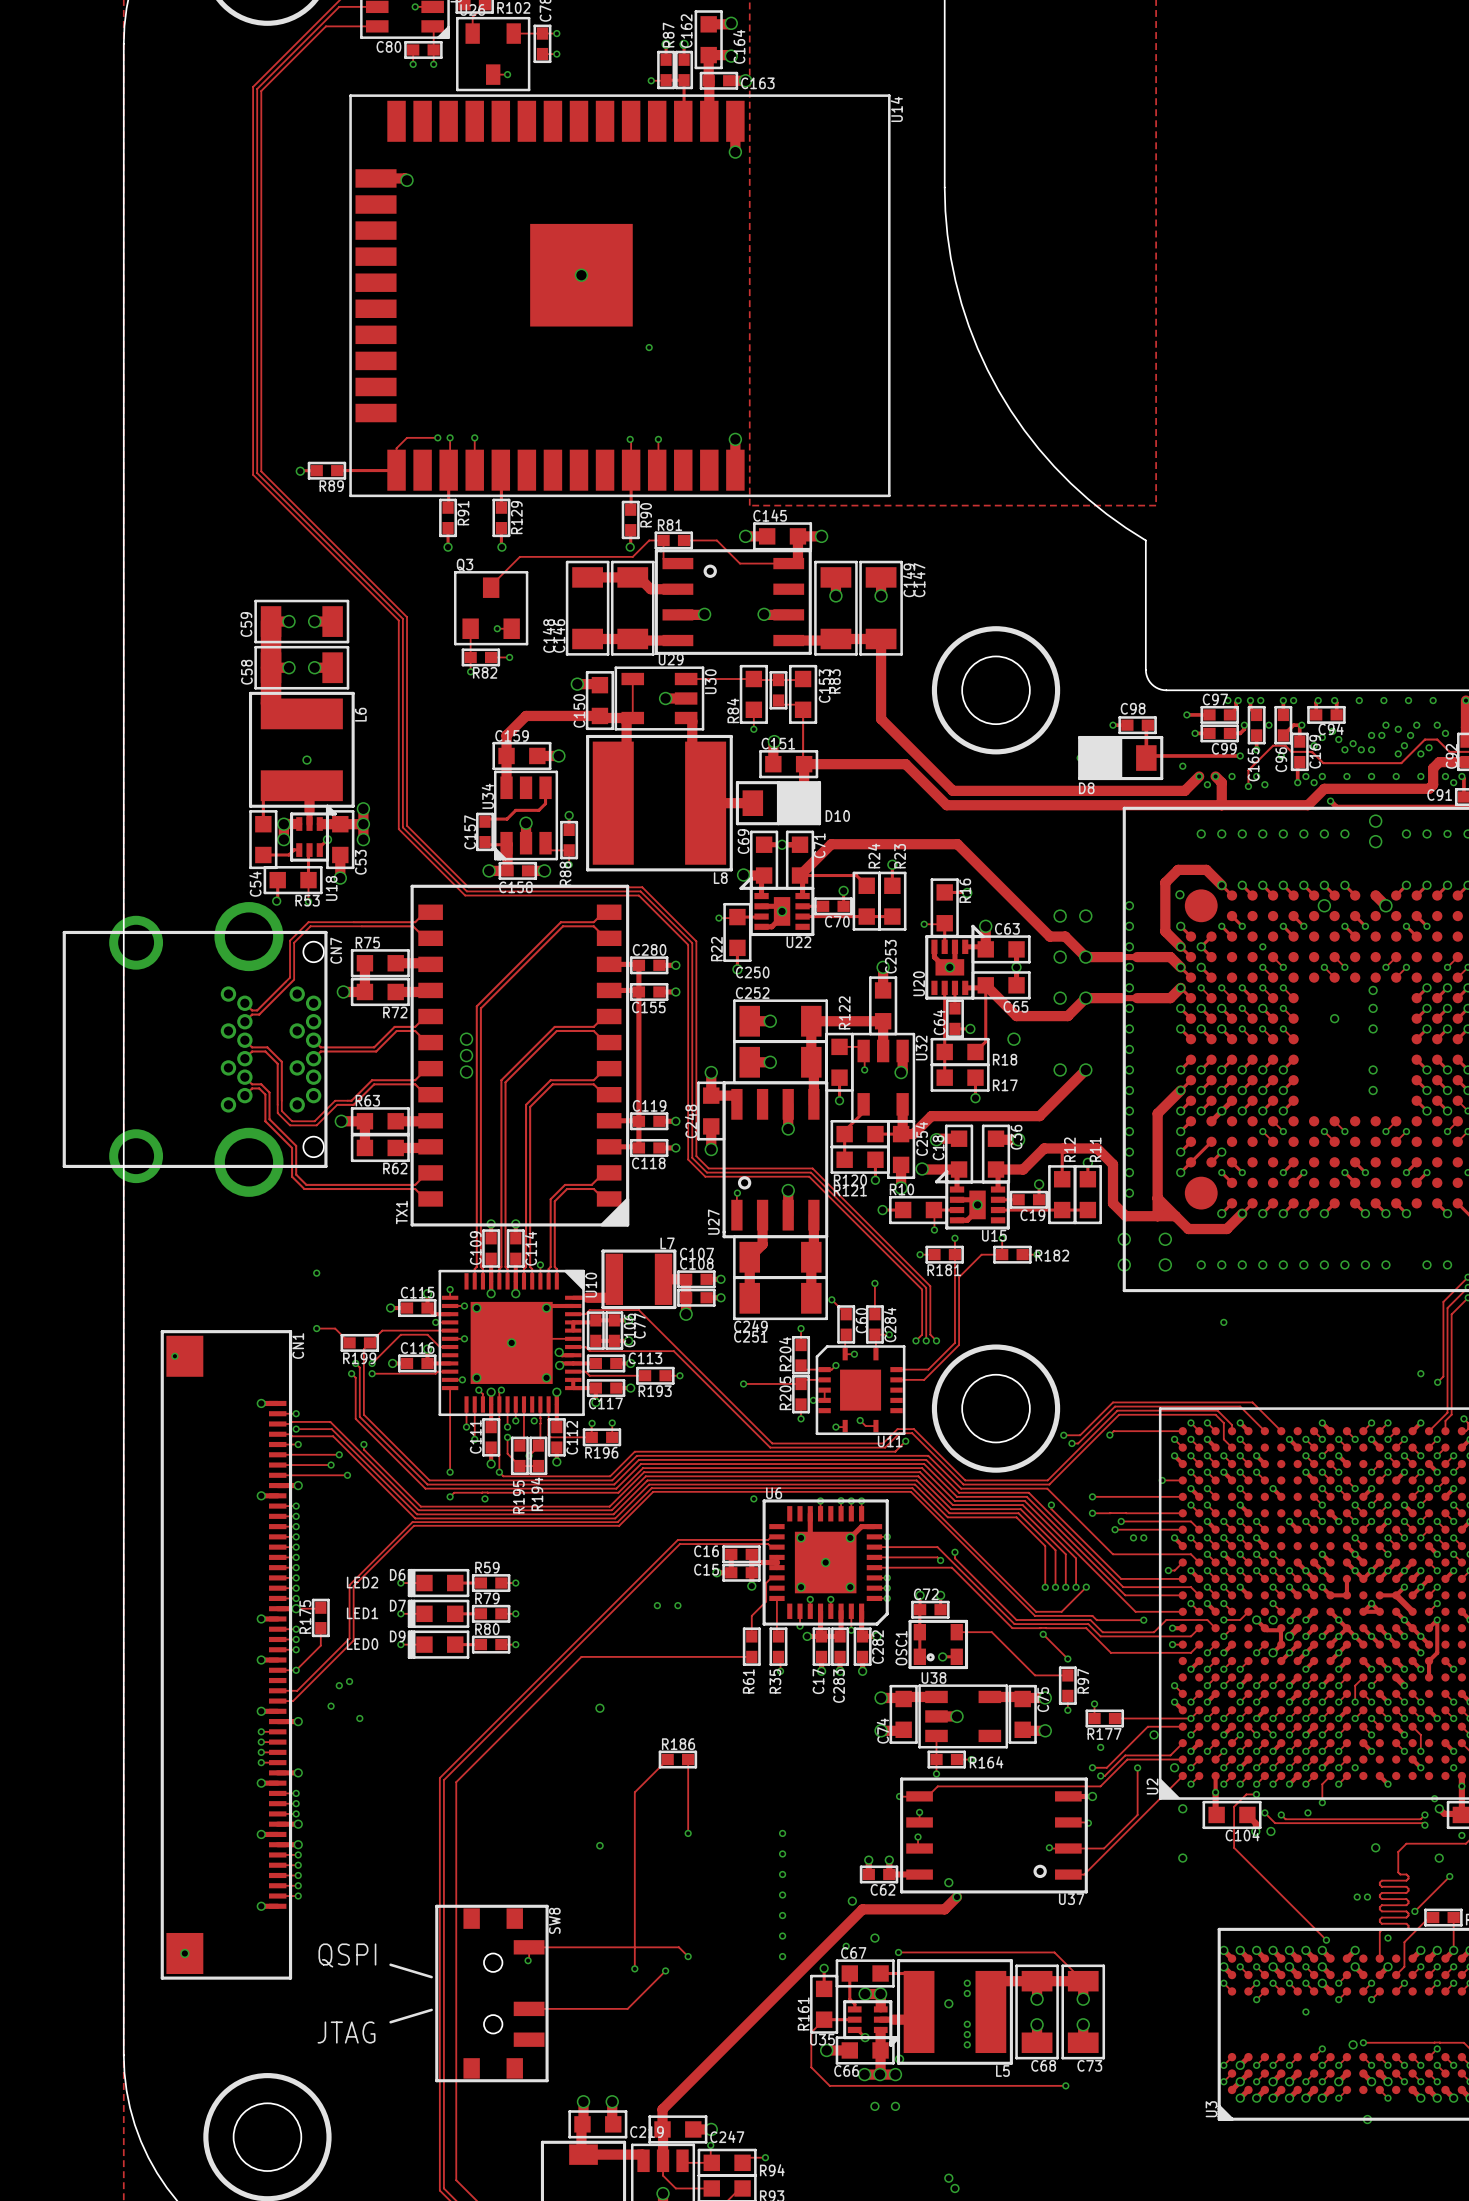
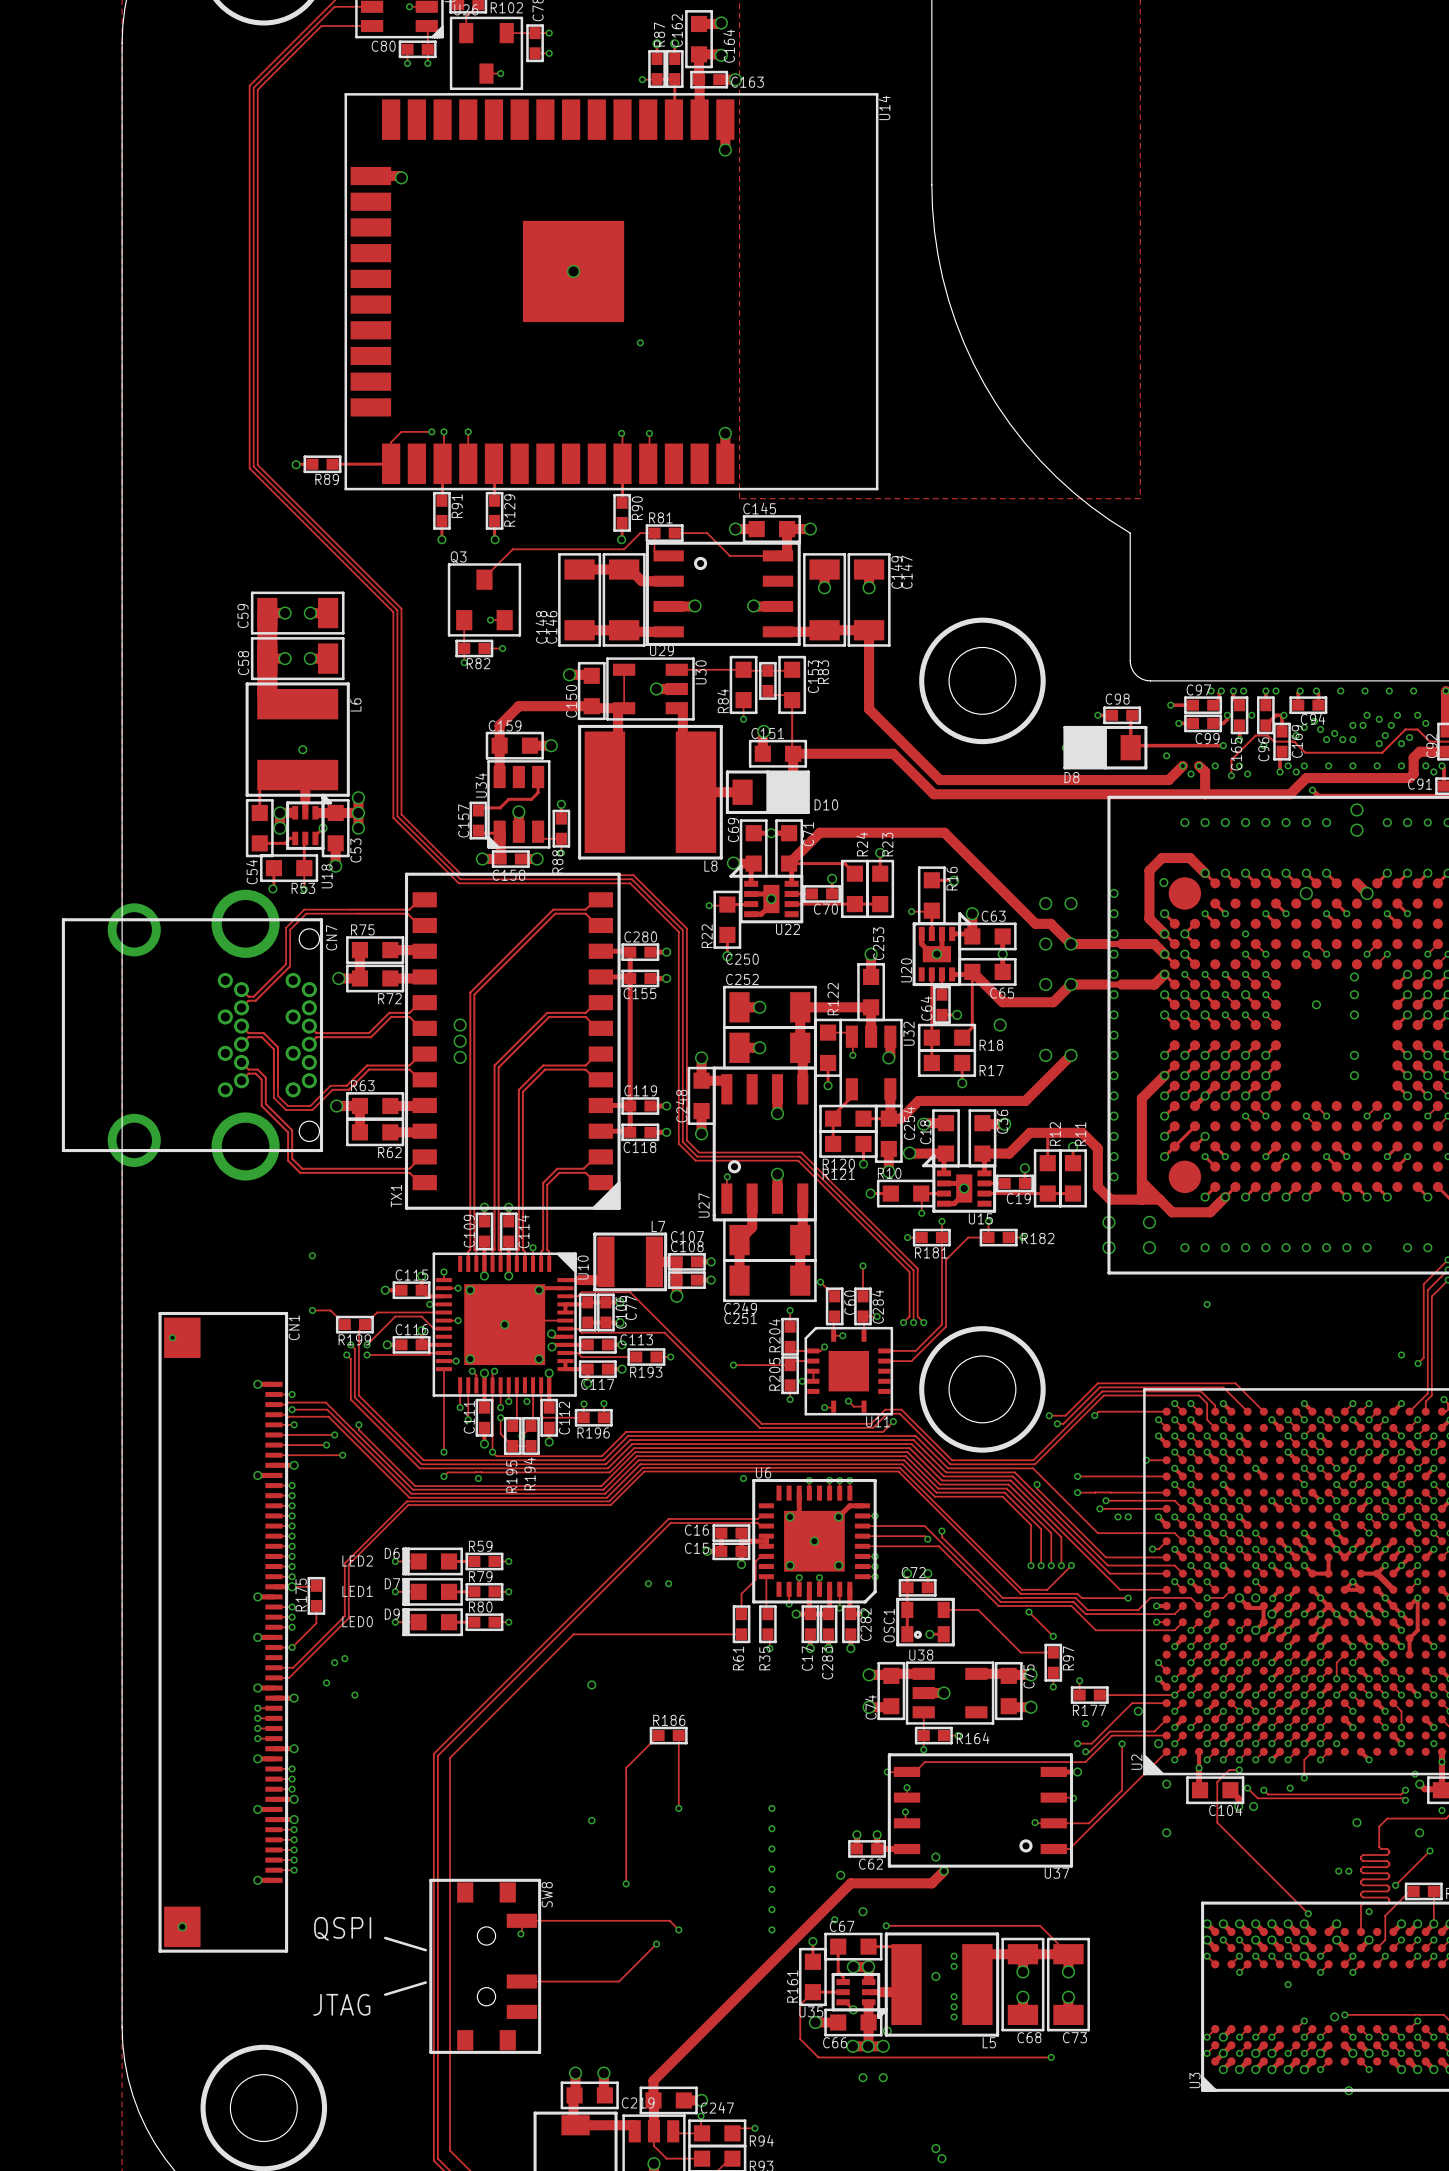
track: (634, 1909) (634, 1968) -> none
via position: (634, 1968) -> (626, 1883)

